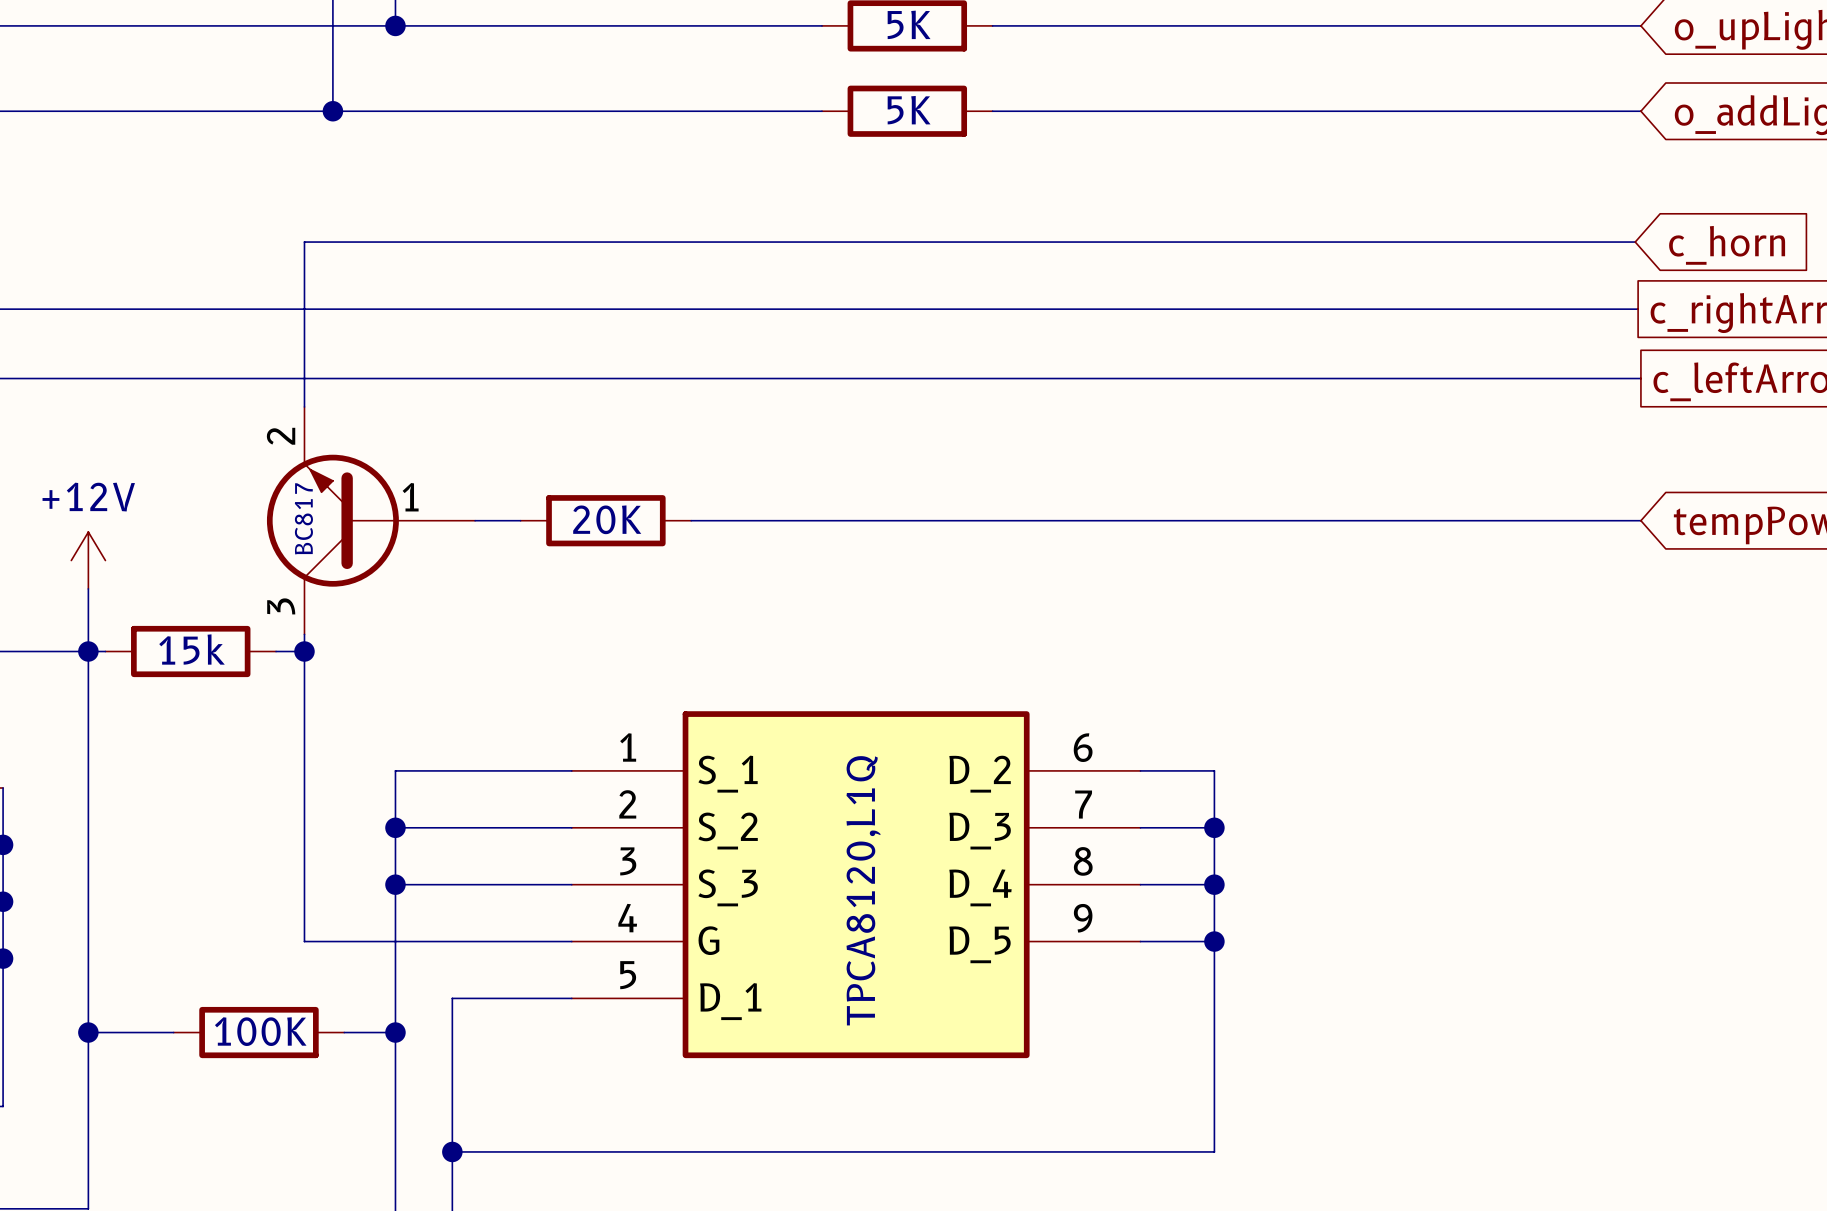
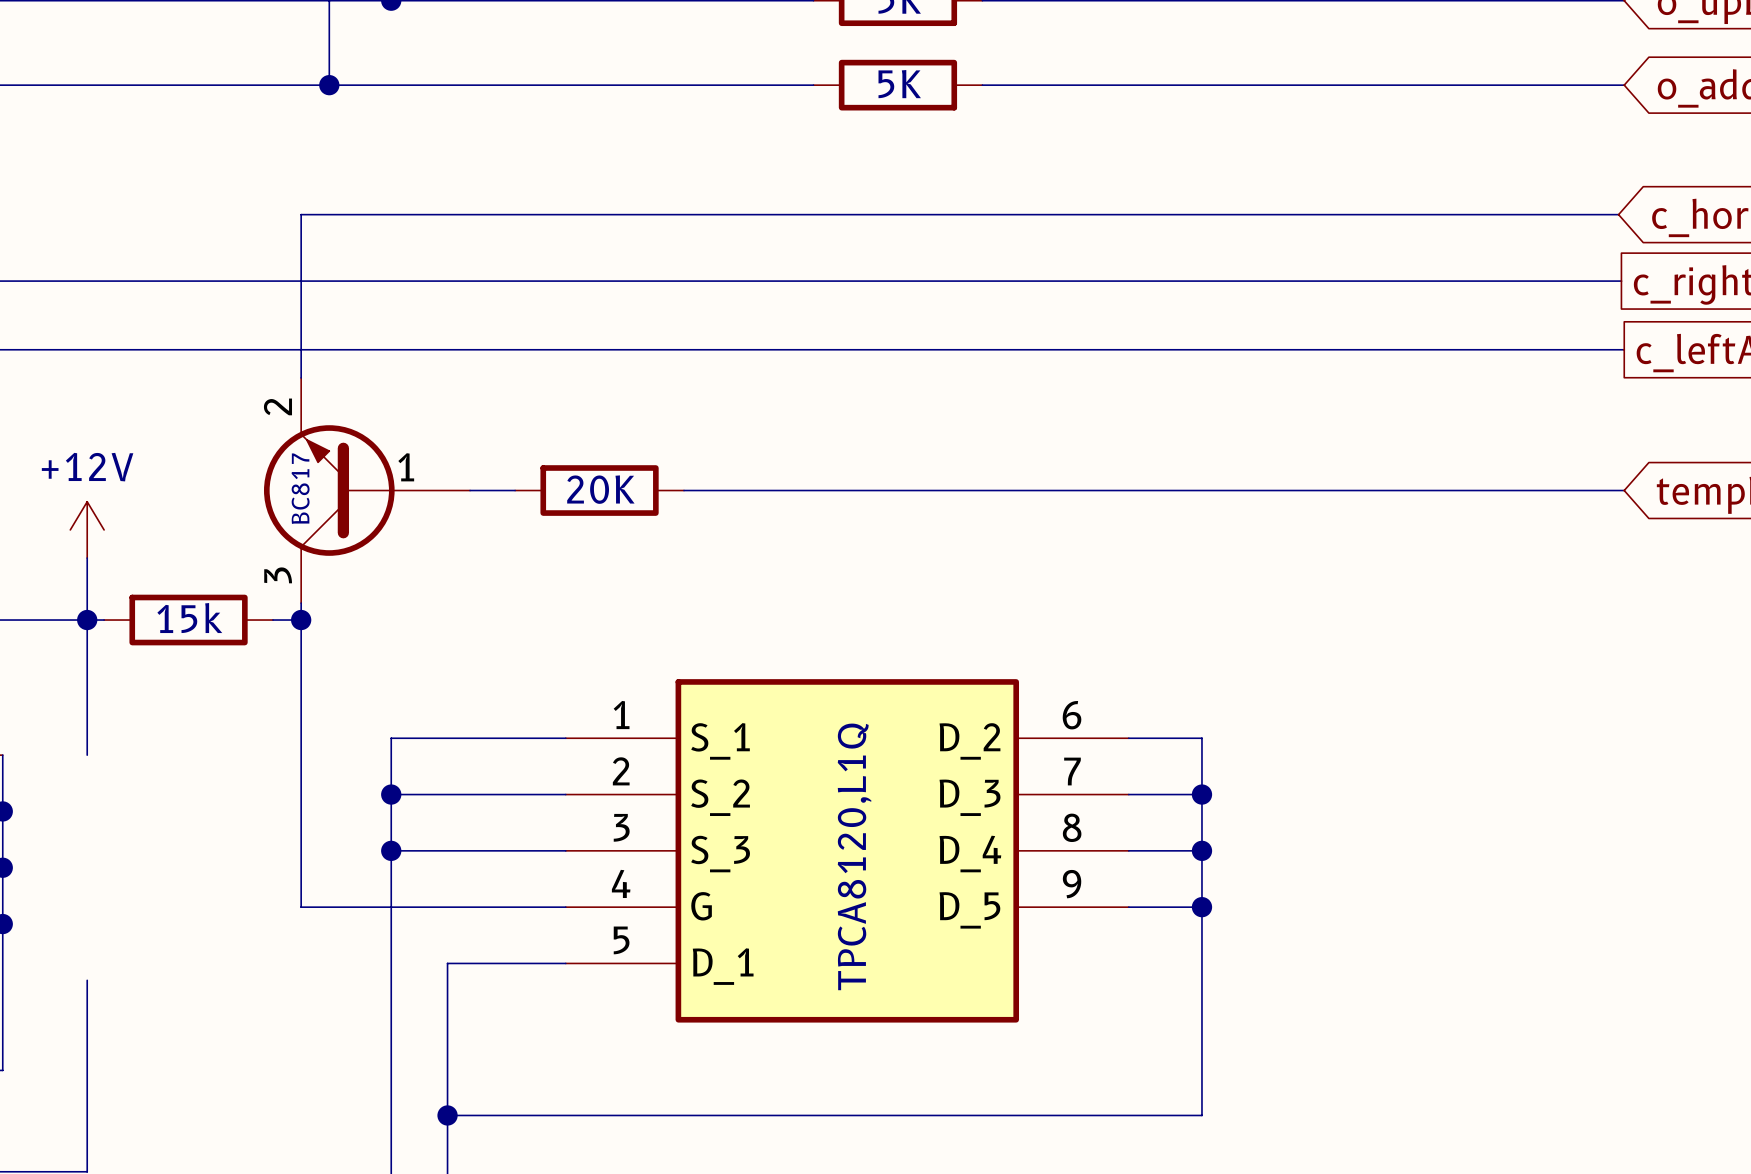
wire: (88, 787) (88, 1015) -> none
wire: (88, 1032) (173, 1032) -> none
junction: (88, 1032) -> none
part: 100K (258, 1032) -> none
wire: (344, 1032) (395, 1032) -> none
junction: (395, 1032) -> none

